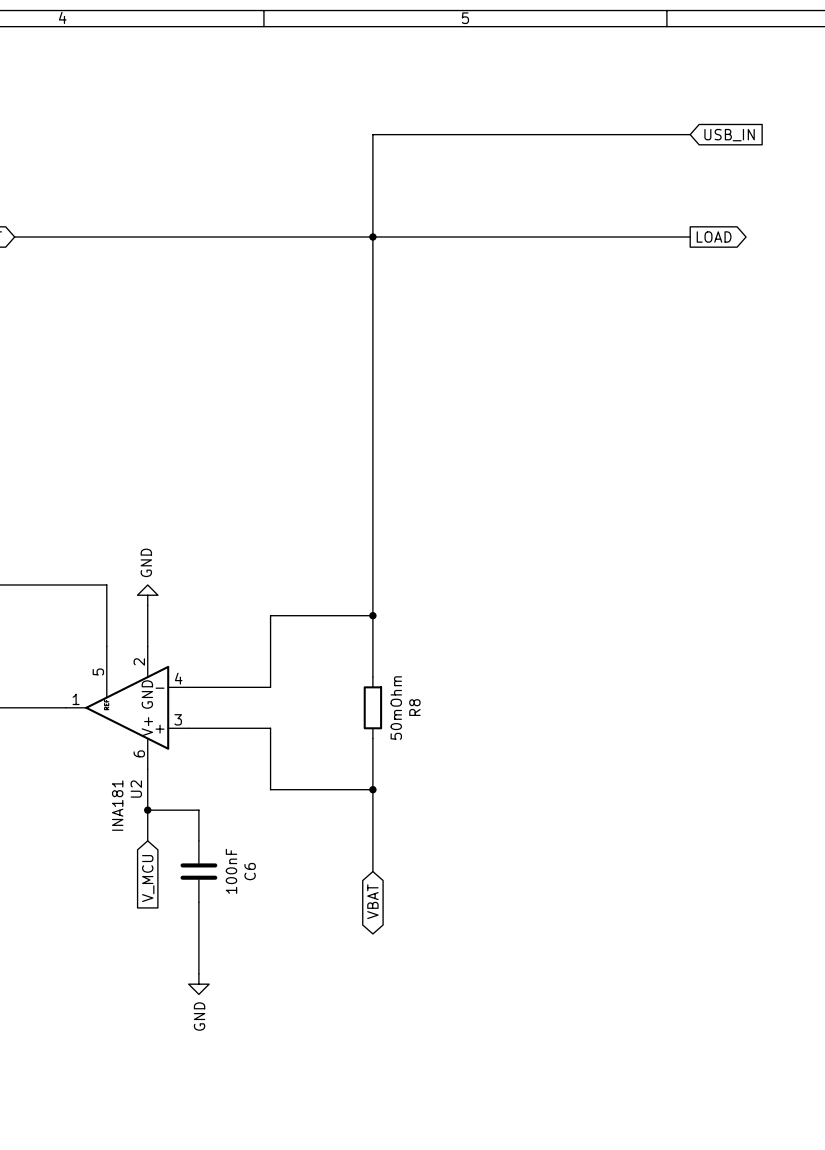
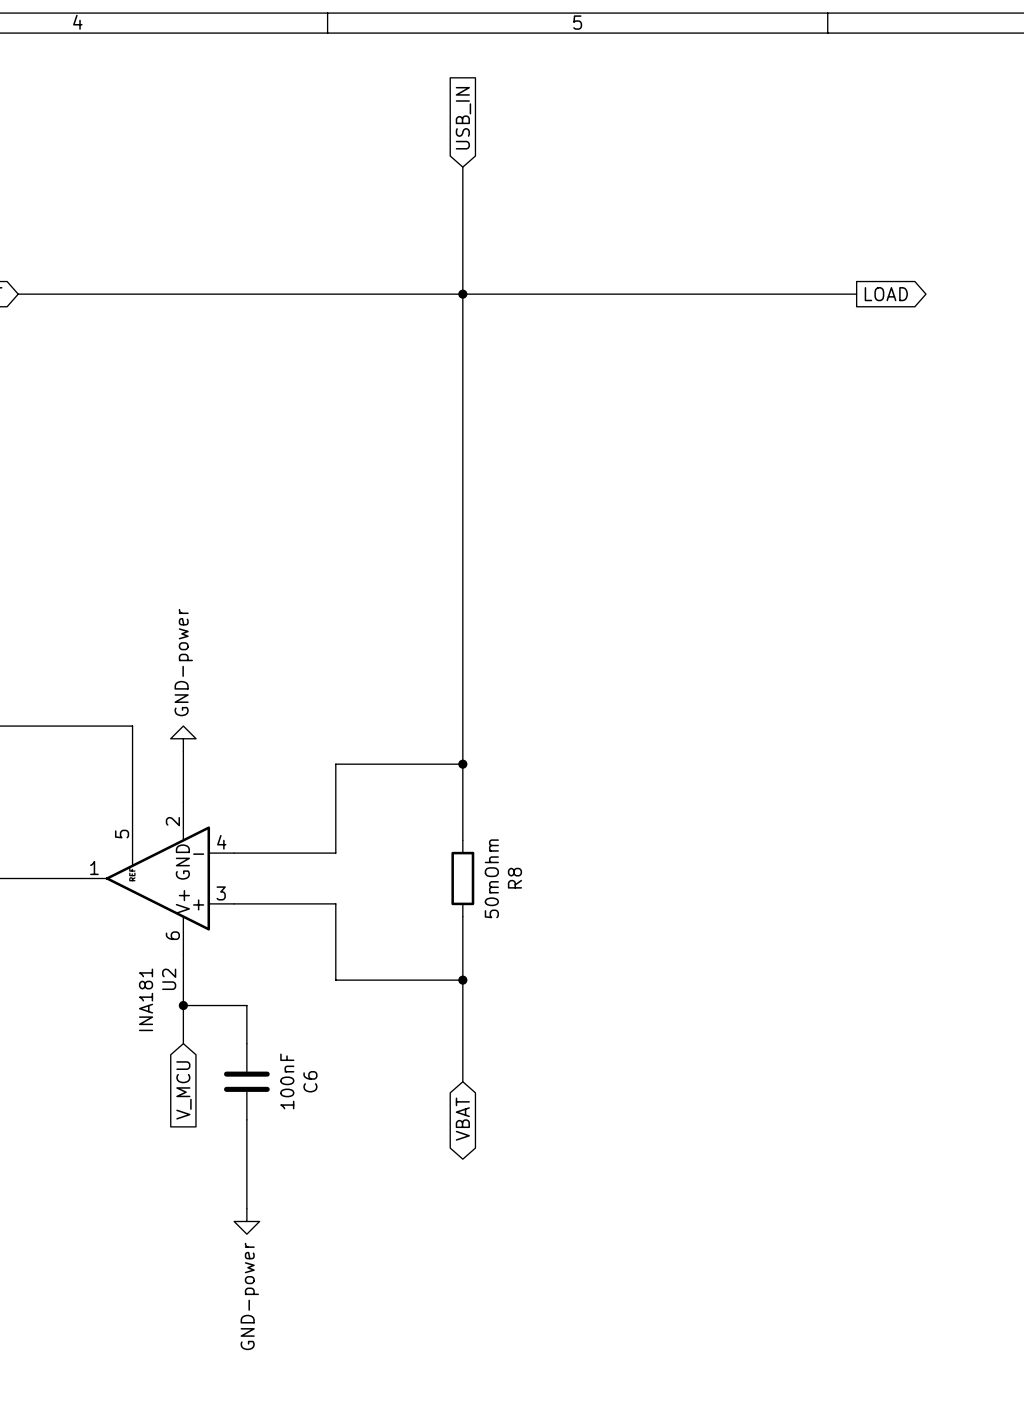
global label: none -> USB_IN (463, 118)
wire: (372, 134) (690, 134) -> none
global label: USB_IN (729, 135) -> none
power symbol: GND (147, 595) -> GND-power (183, 738)
power symbol: GND (198, 984) -> GND-power (246, 1221)

